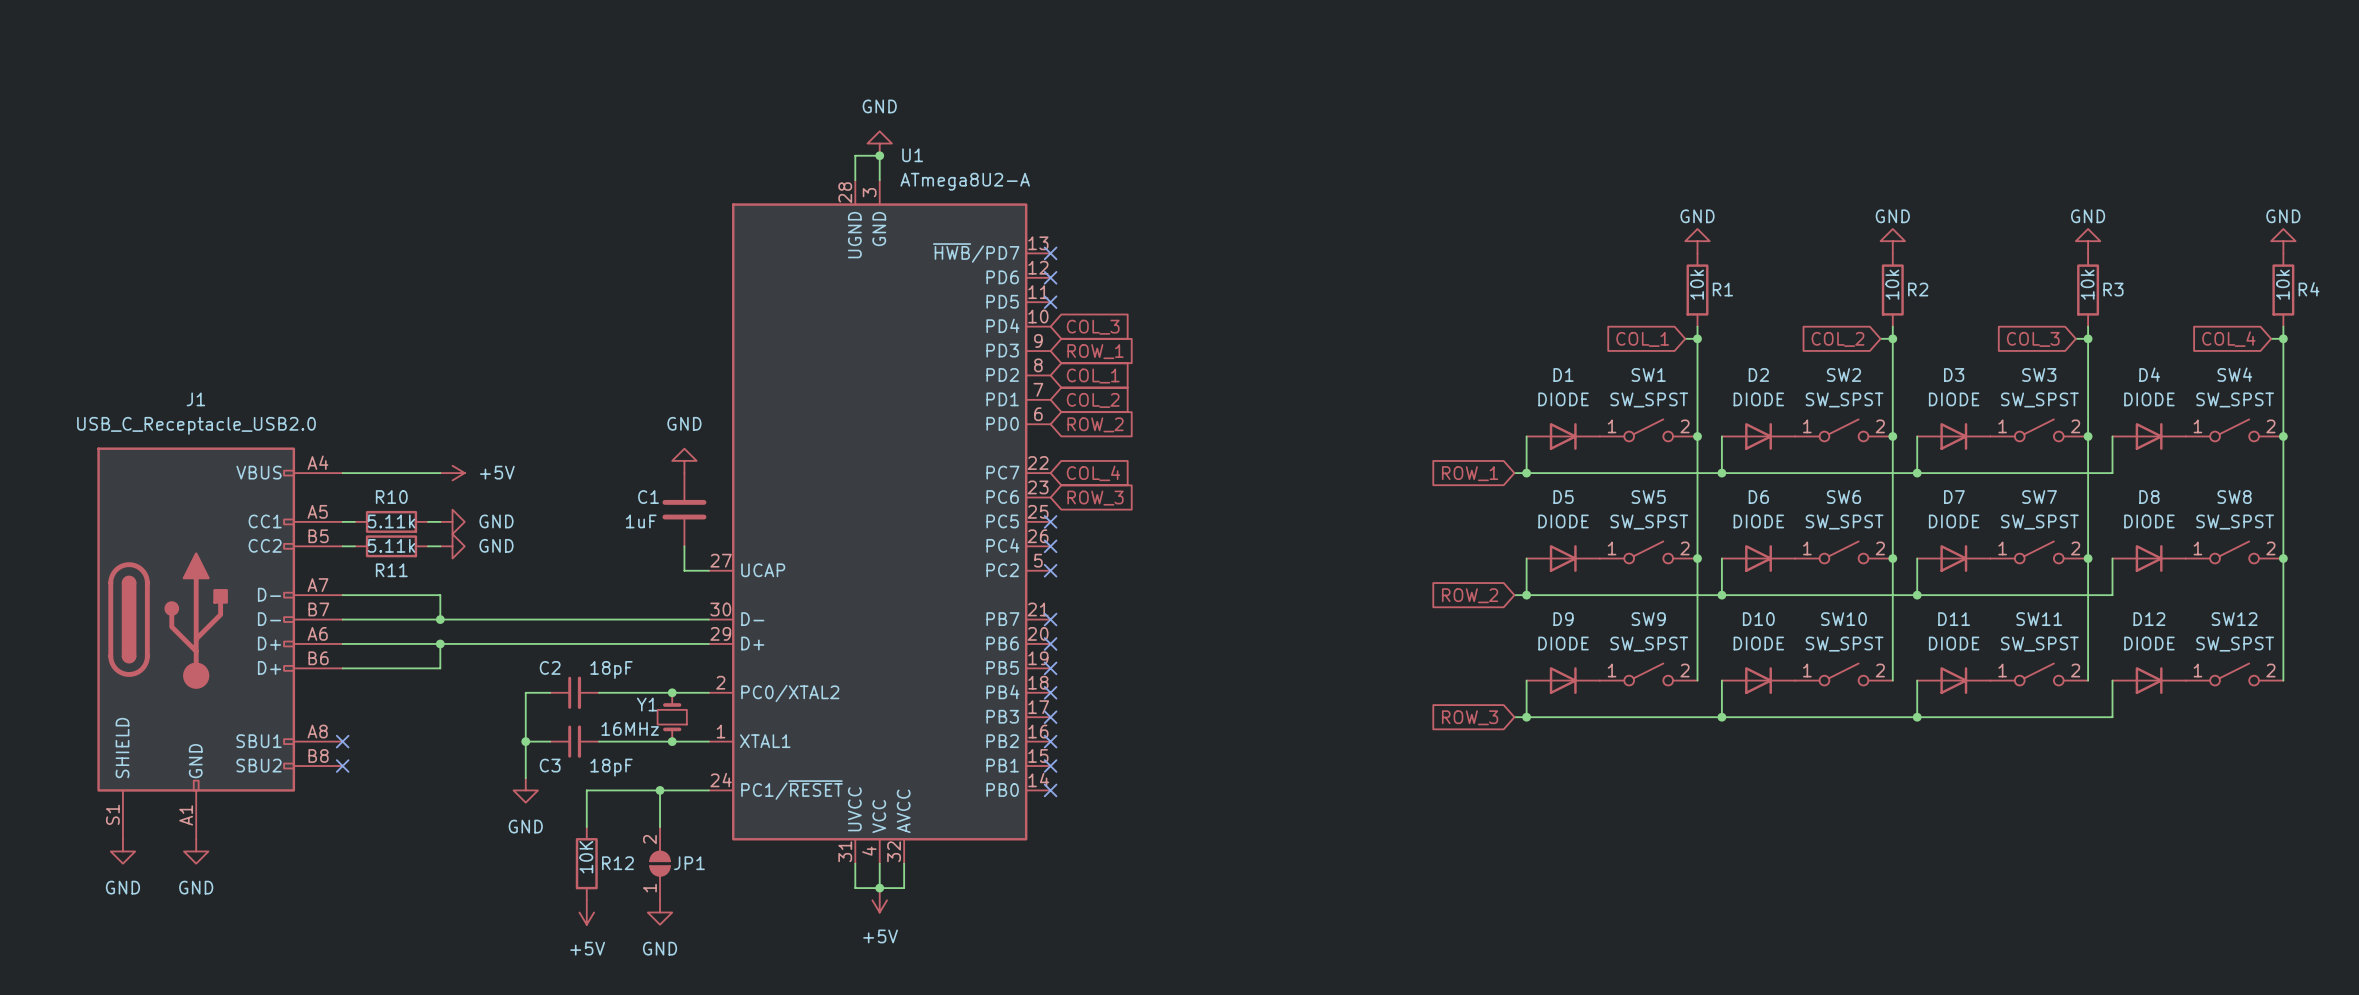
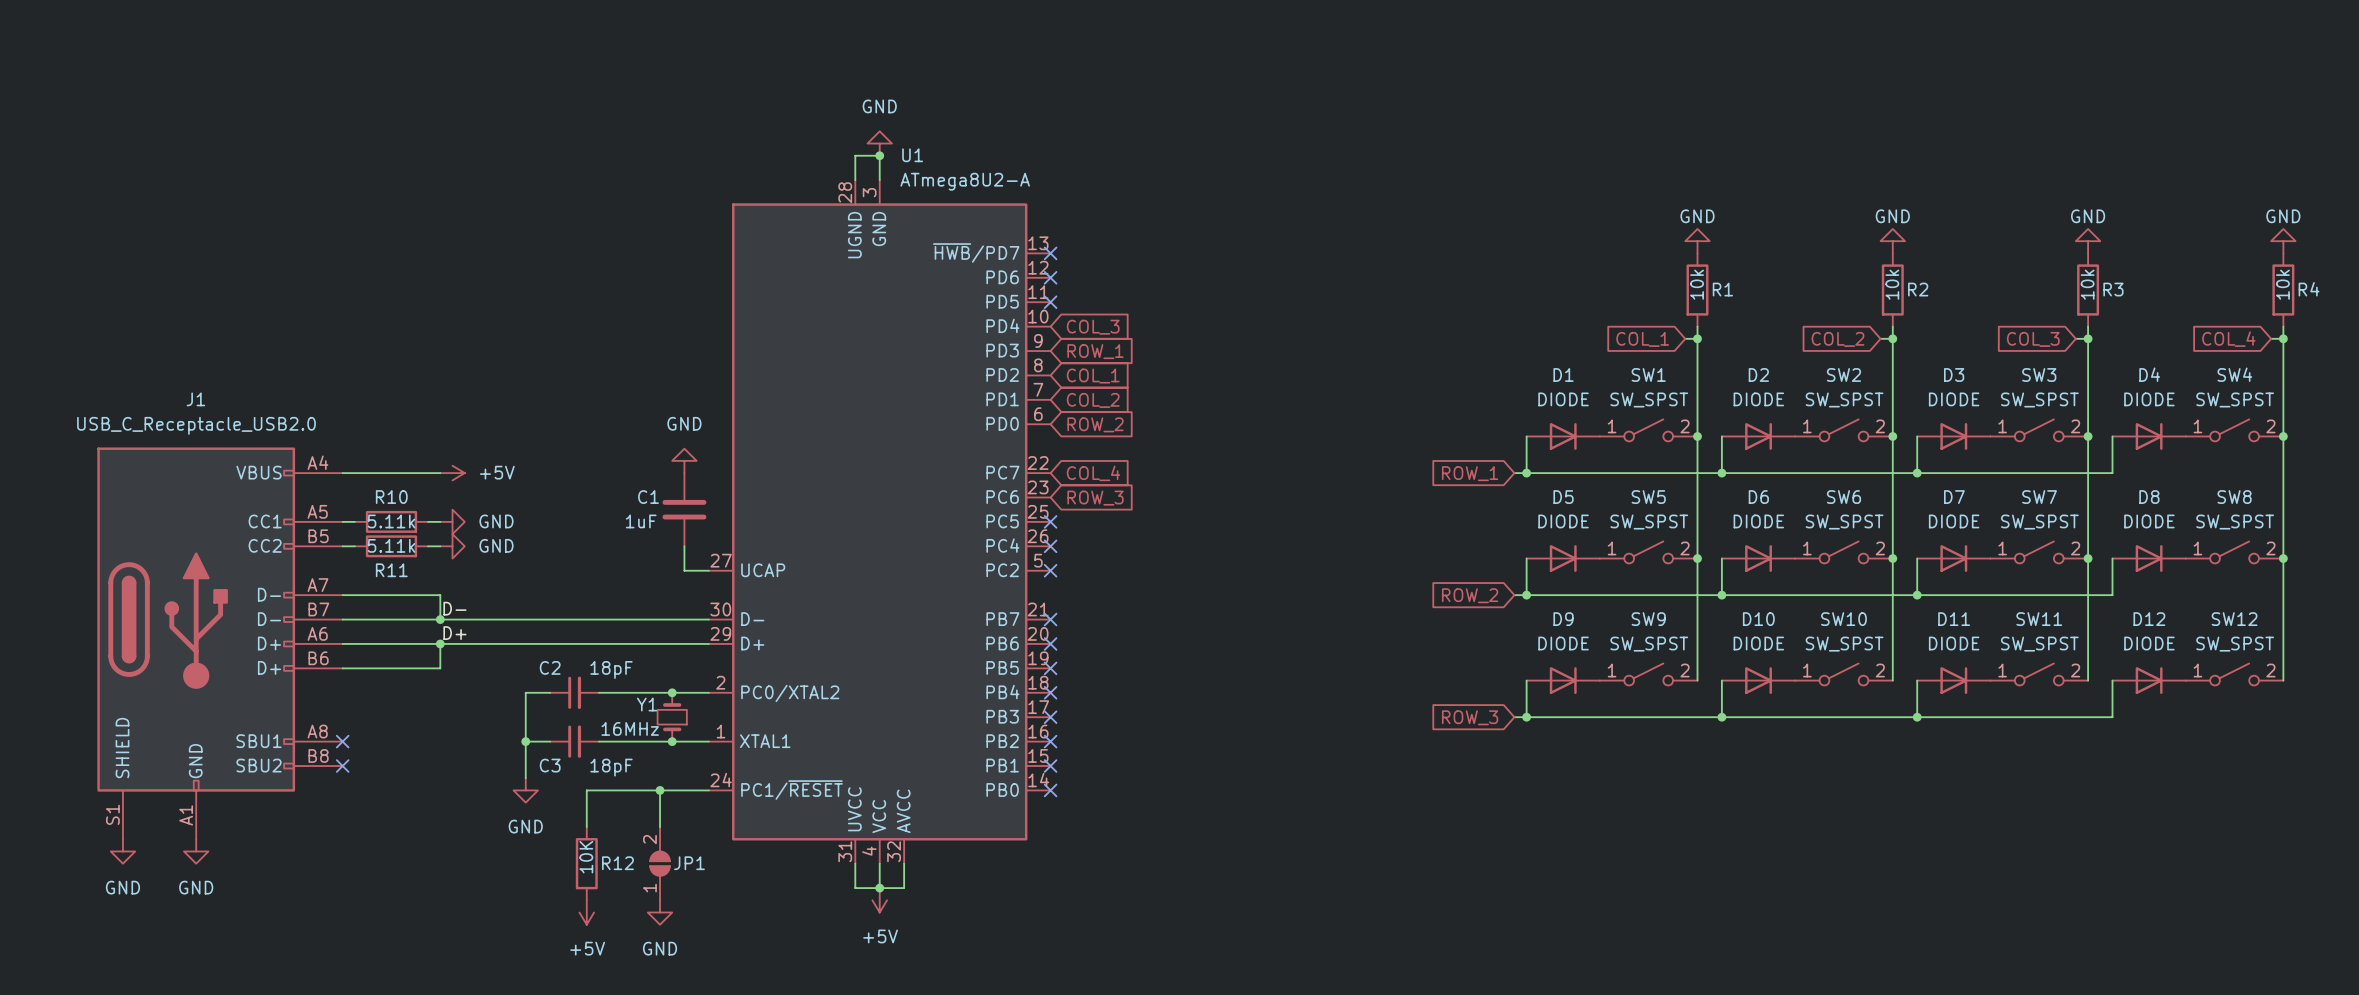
label: none -> D- (454, 608)
label: none -> D+ (454, 633)

